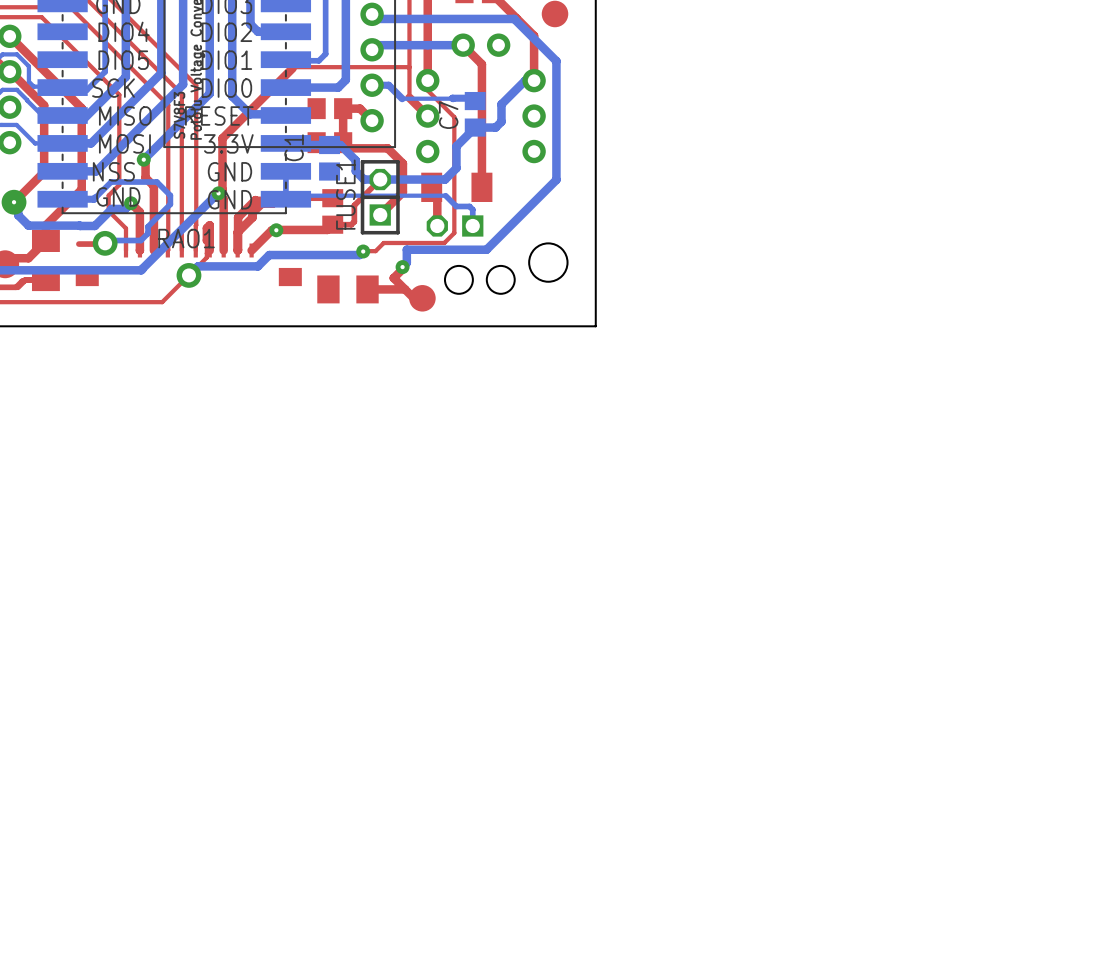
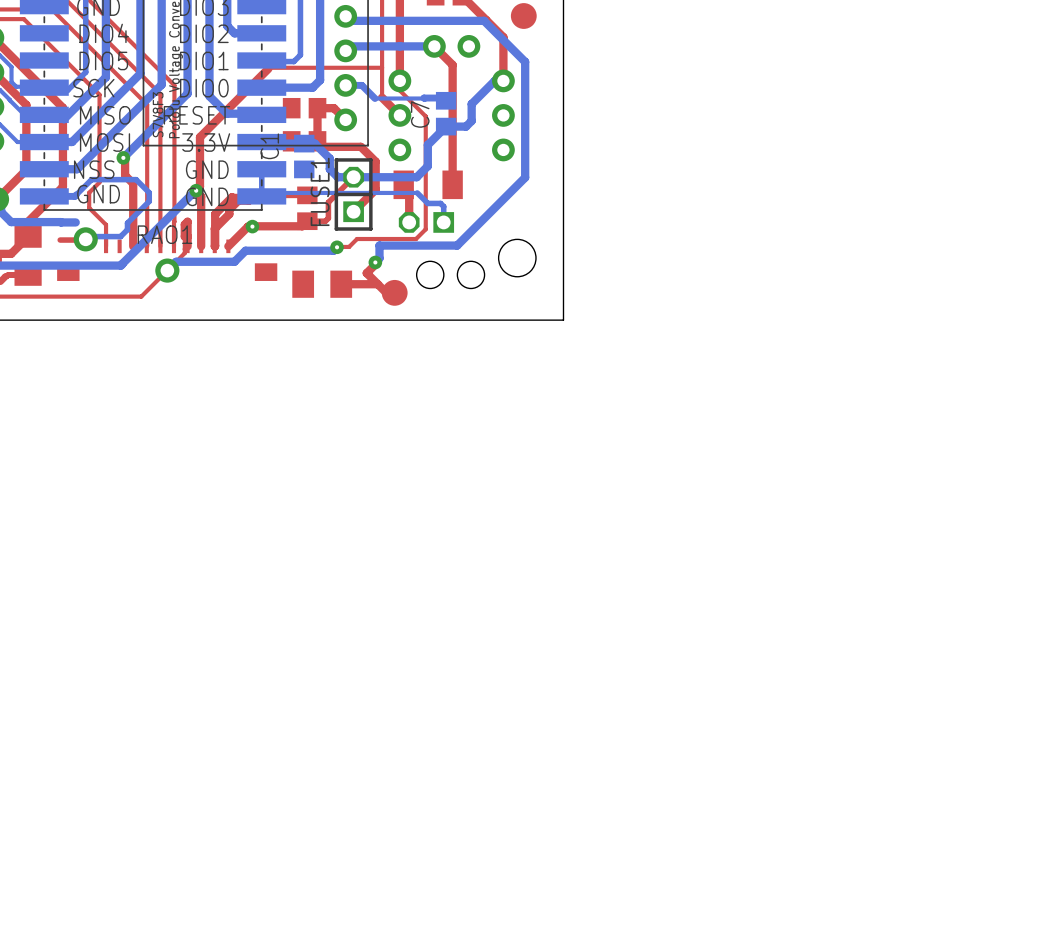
top track: (131, 203) (139, 212) (139, 250) -> none
bottom track: (131, 203) (125, 208) (111, 208) (94, 225) -> none
via: (131, 203) -> none

